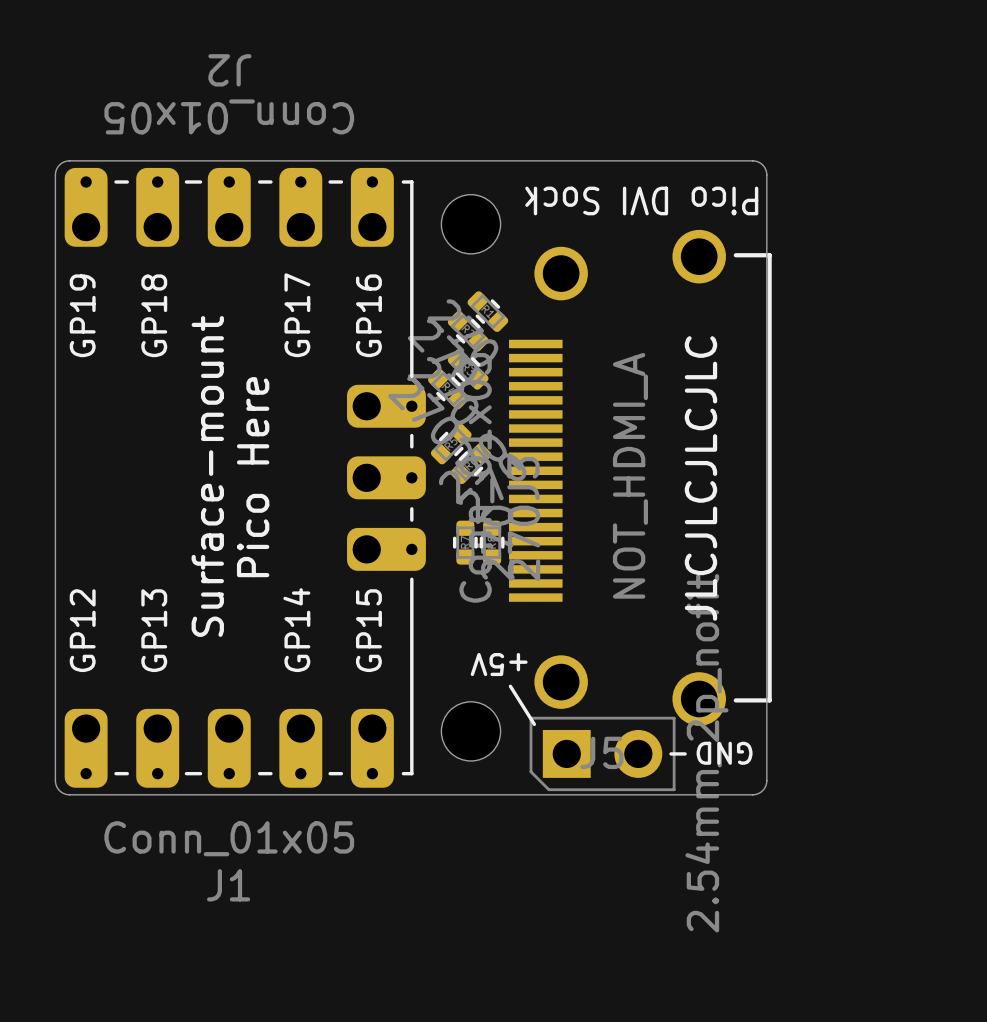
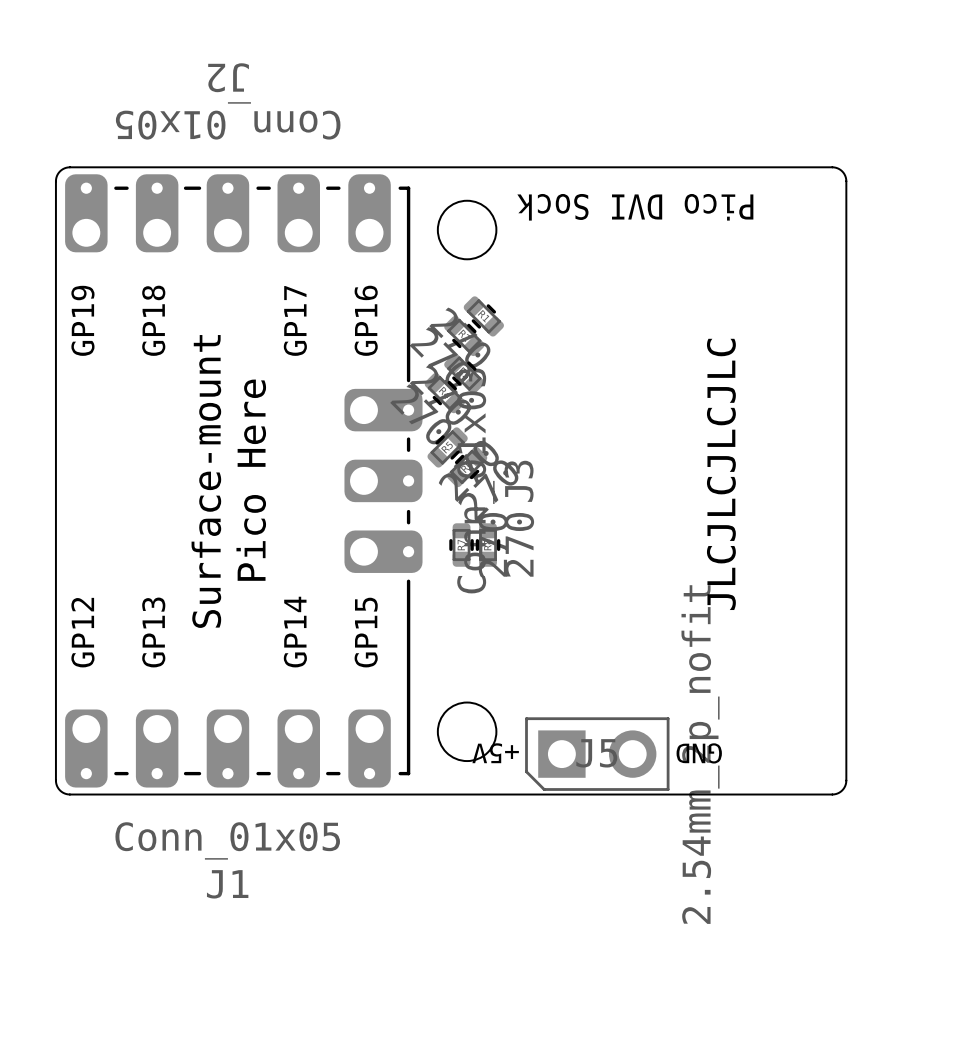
board edge: (752, 160) (762, 164) (766, 174) (766, 780) (762, 790) (752, 794) -> (745, 167) (834, 167) (842, 171) (846, 181) (846, 782) (842, 790) (834, 794) (745, 794)
part: NOT_HDMI_A (640, 477) -> none
text position: JLCJLCJLCJLC (700, 478) -> JLCJLCJLCJLC (721, 474)
text position: +5V (499, 664) -> +5V (495, 753)
line: (510, 686) (534, 724) -> none
line: (671, 753) (685, 753) -> none
text position: GND (724, 753) -> GND (699, 753)

